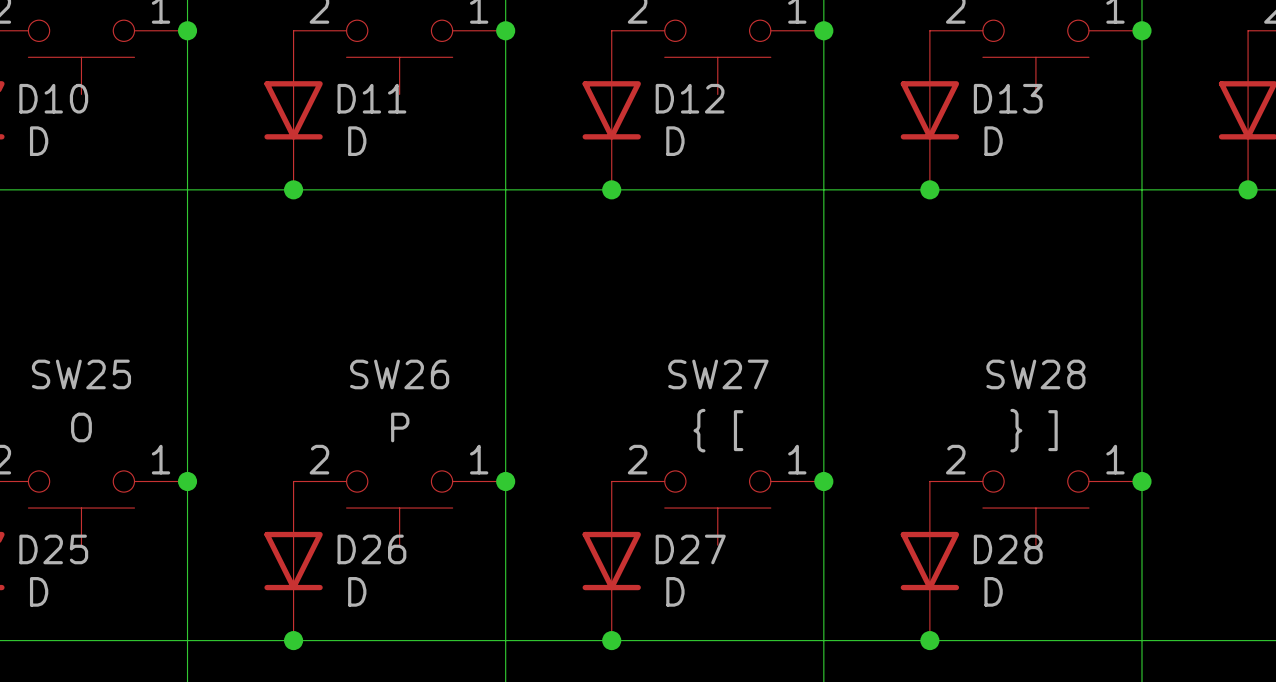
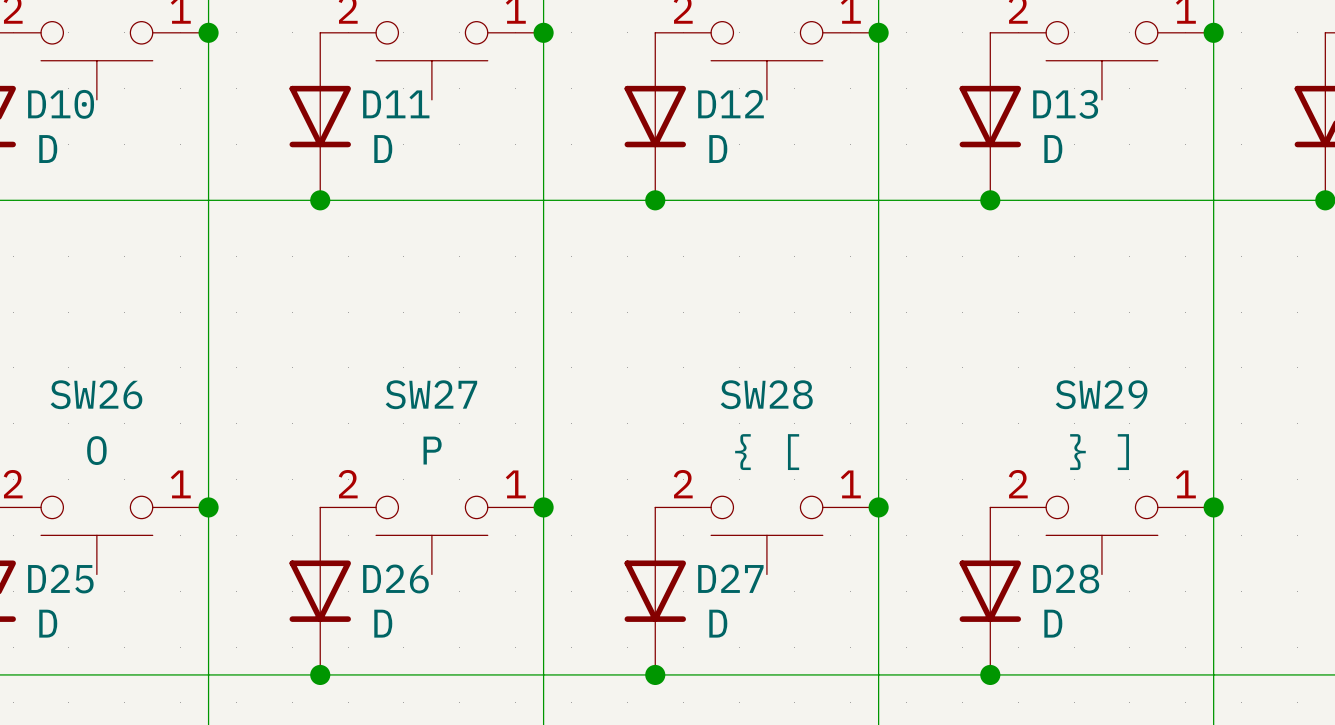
SW25 name: SW25 (81, 374) -> SW26 (96, 394)
SW26 name: SW26 (399, 374) -> SW27 (431, 394)
SW27 name: SW27 (718, 374) -> SW28 (766, 394)
SW28 name: SW28 (1035, 374) -> SW29 (1101, 394)

